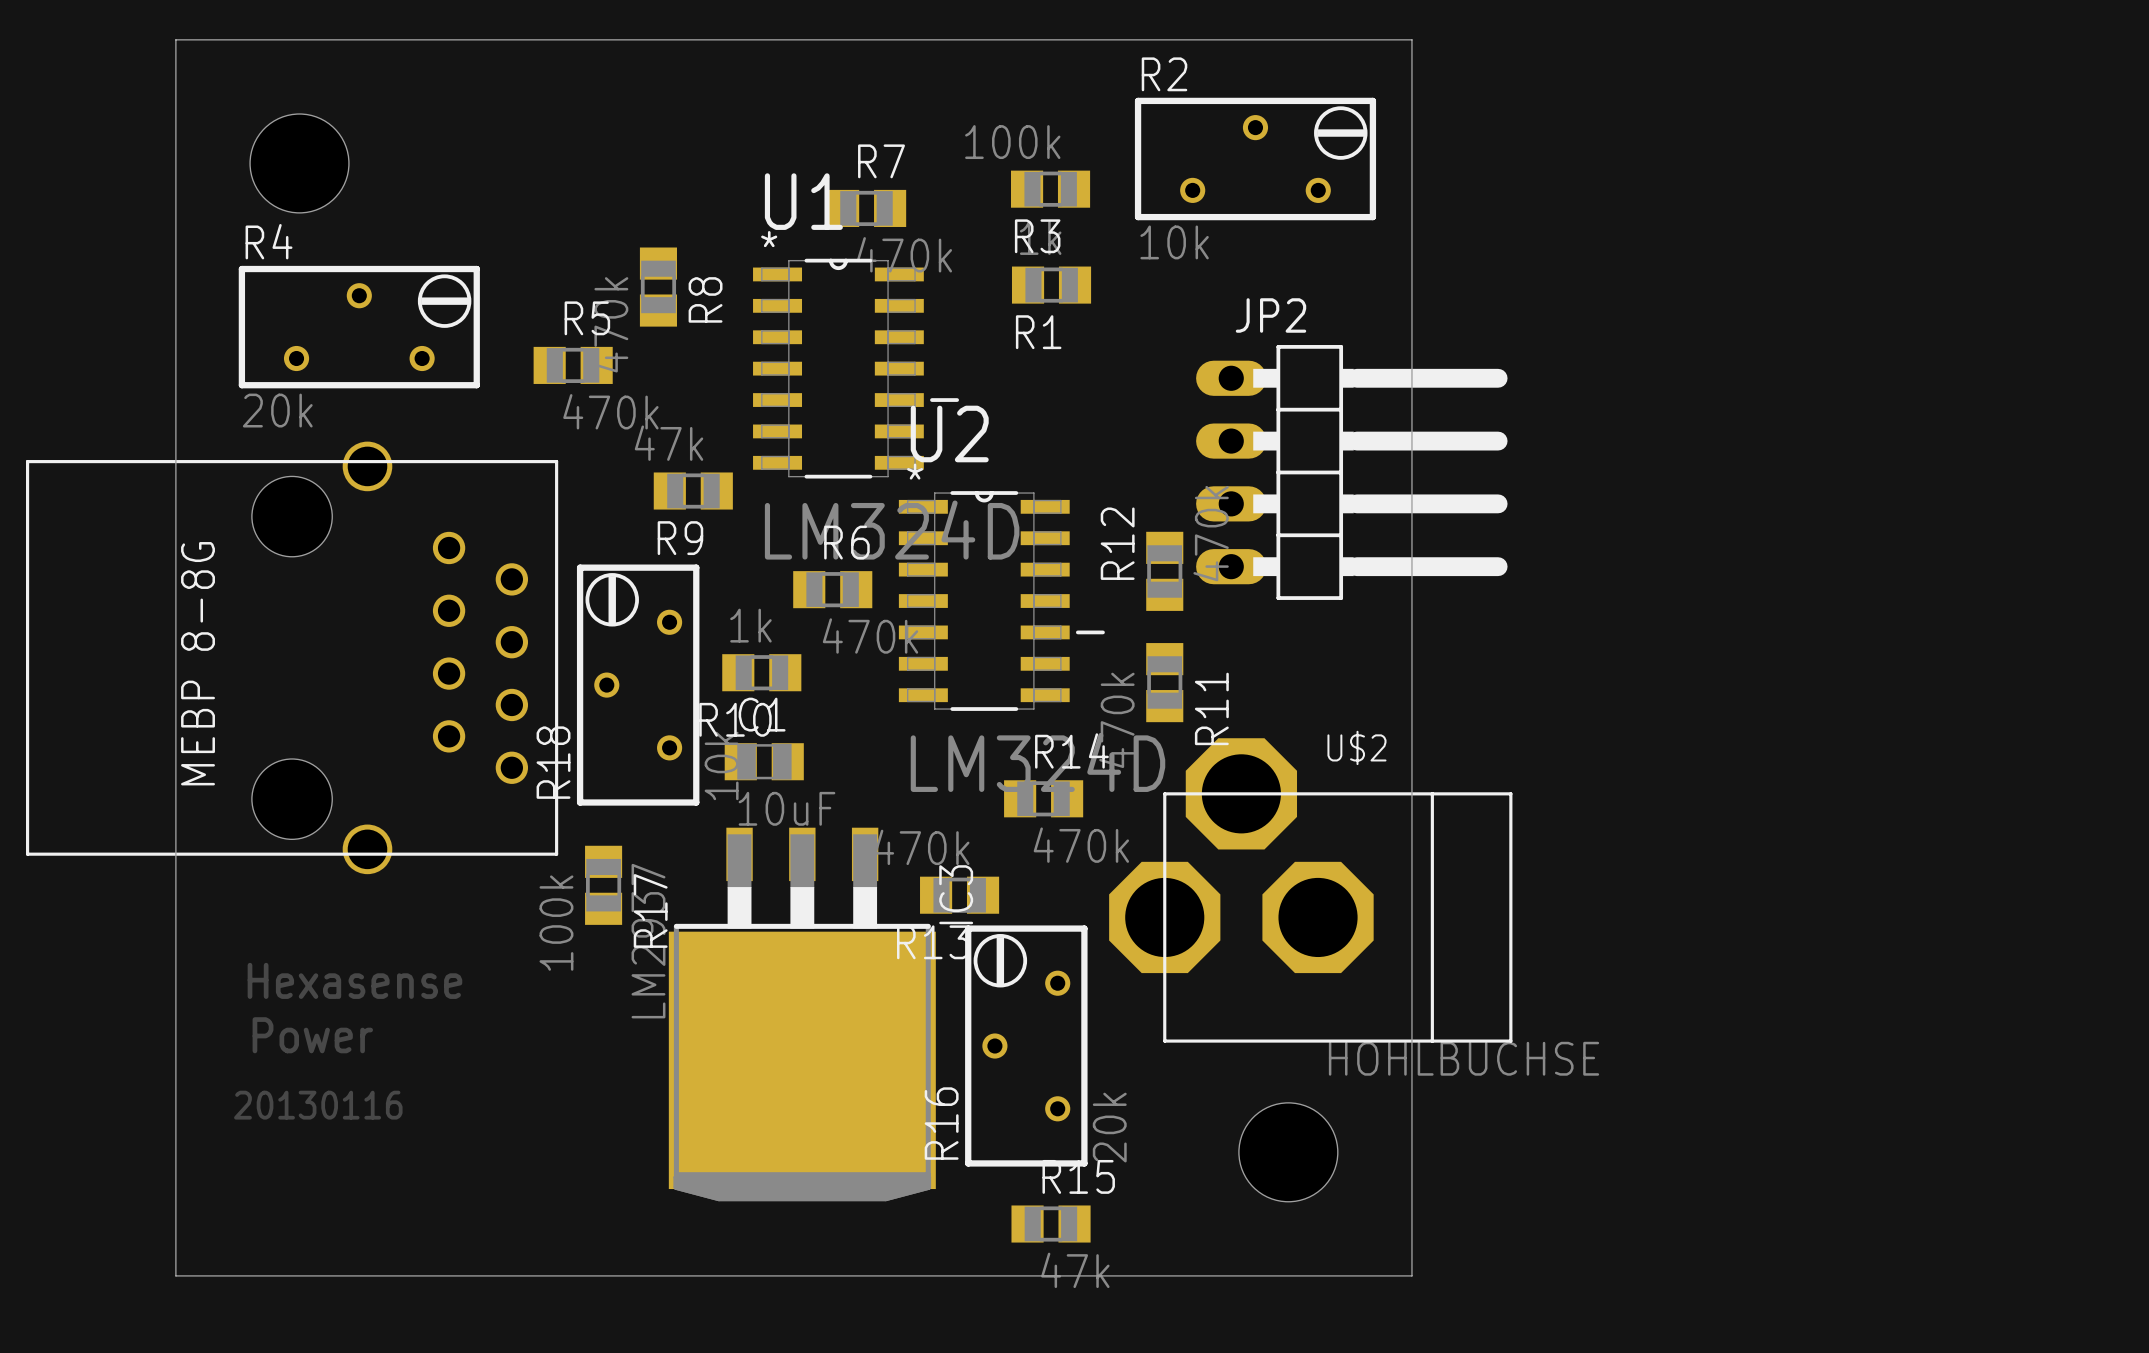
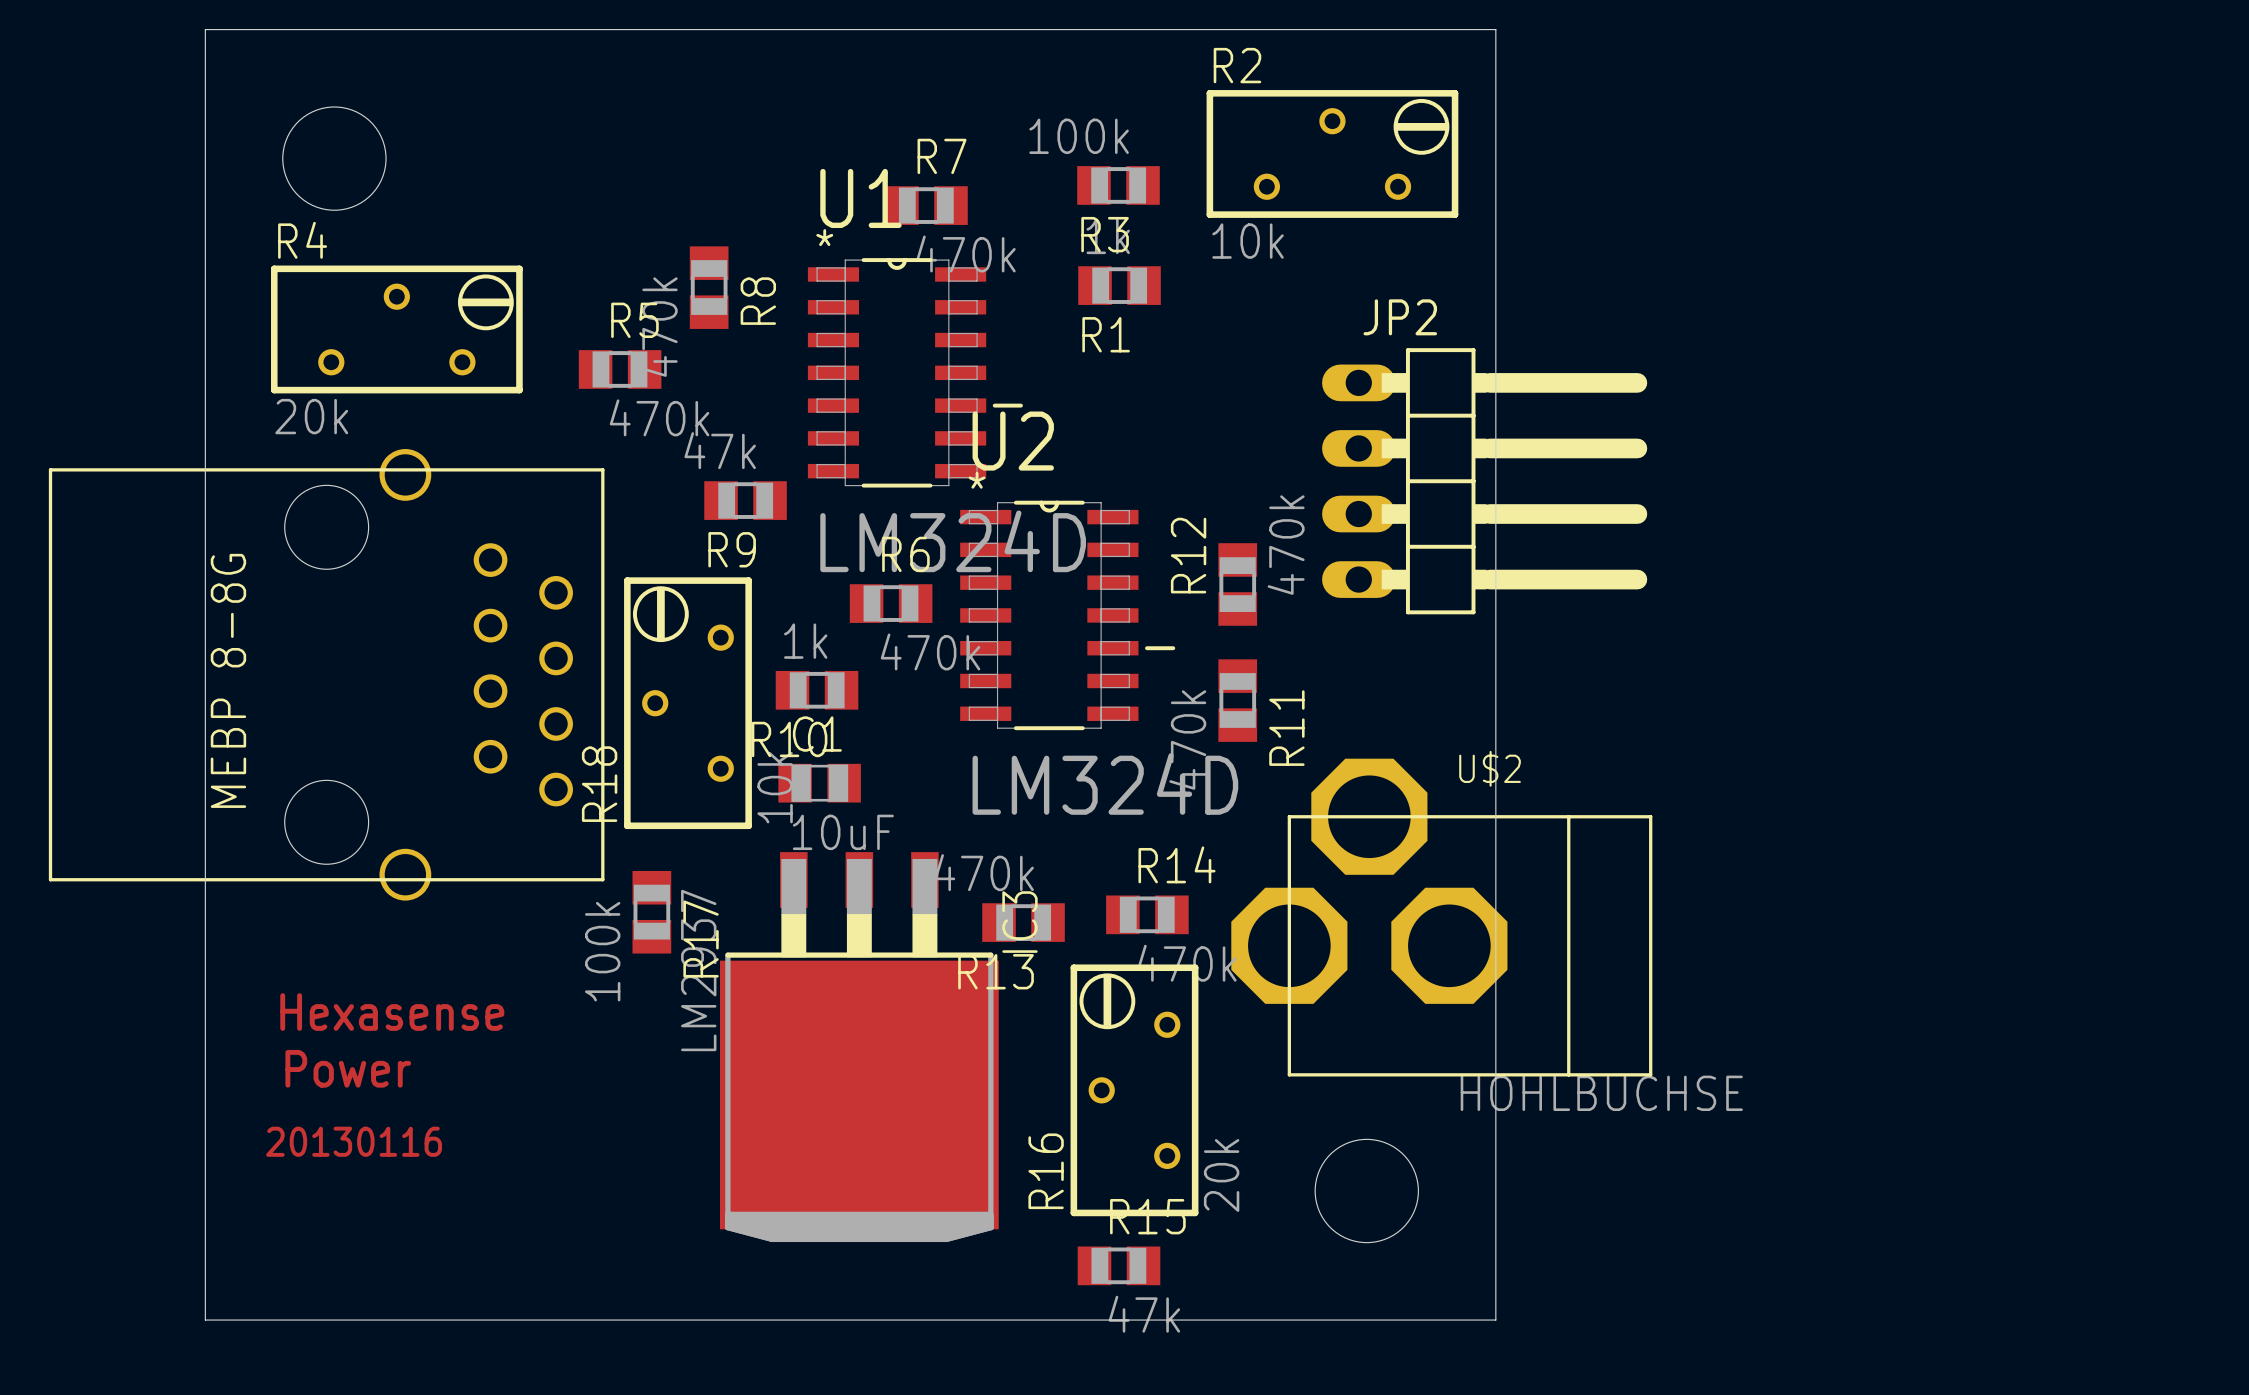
JP2 position: (1351, 472) -> (1484, 481)
R14 position: (1043, 798) -> (1147, 914)
U$2 position: (1310, 890) -> (1441, 917)
R16 position: (1026, 1046) -> (1134, 1090)

